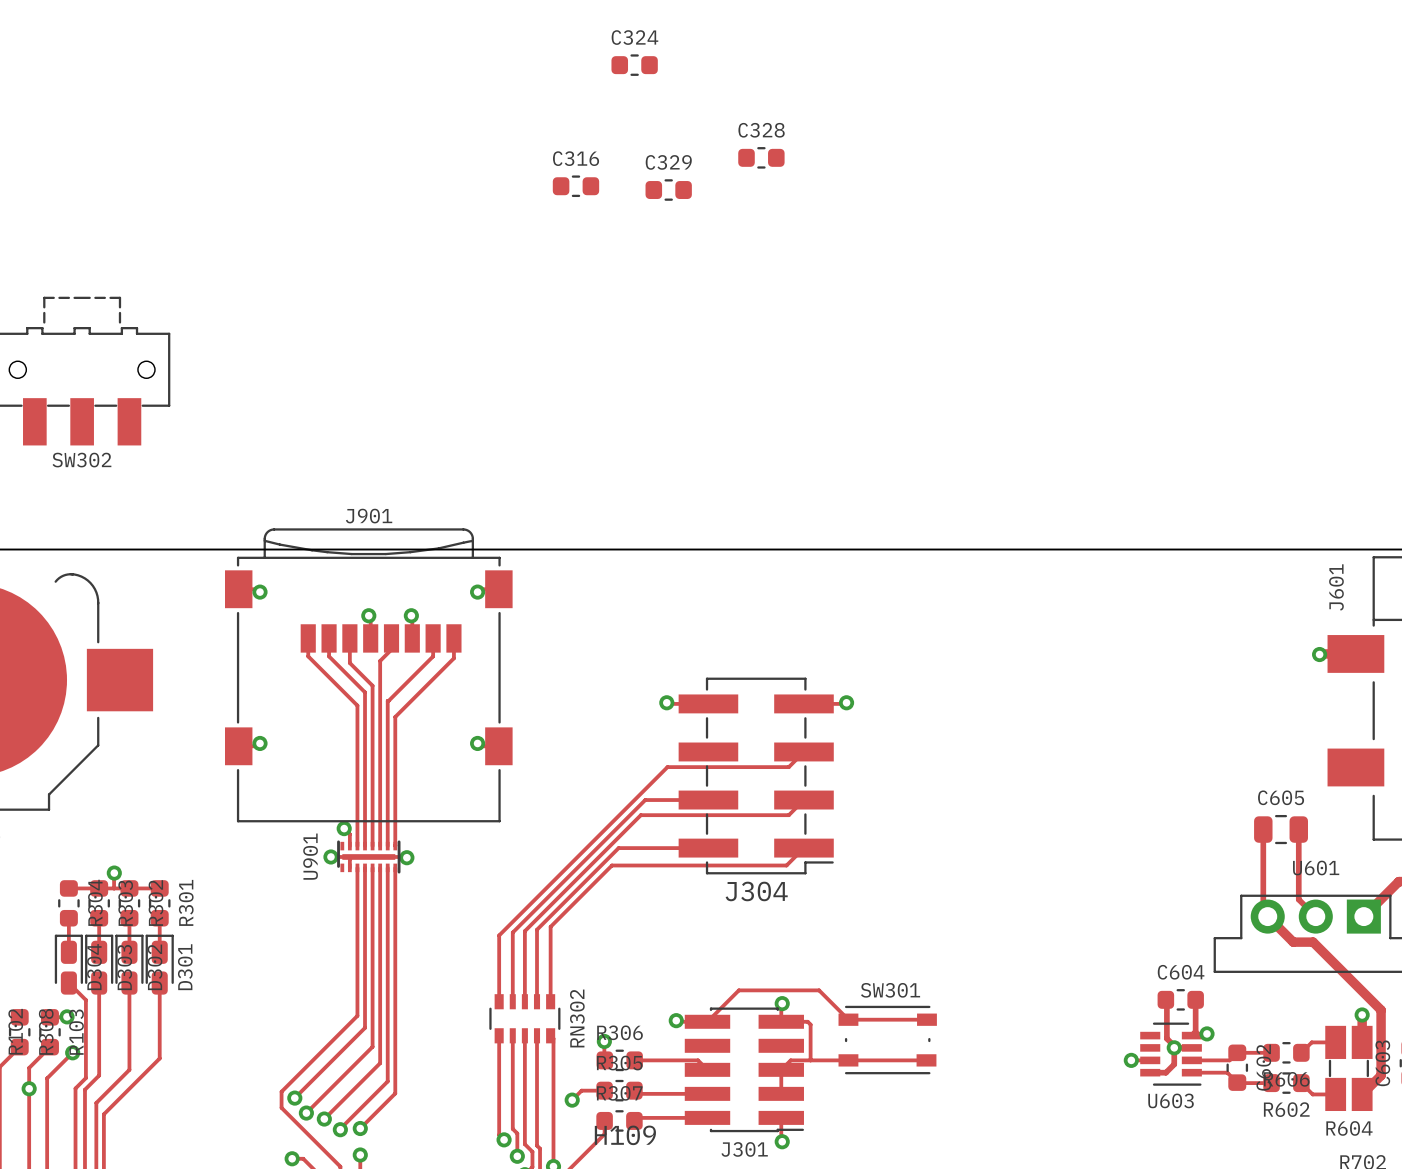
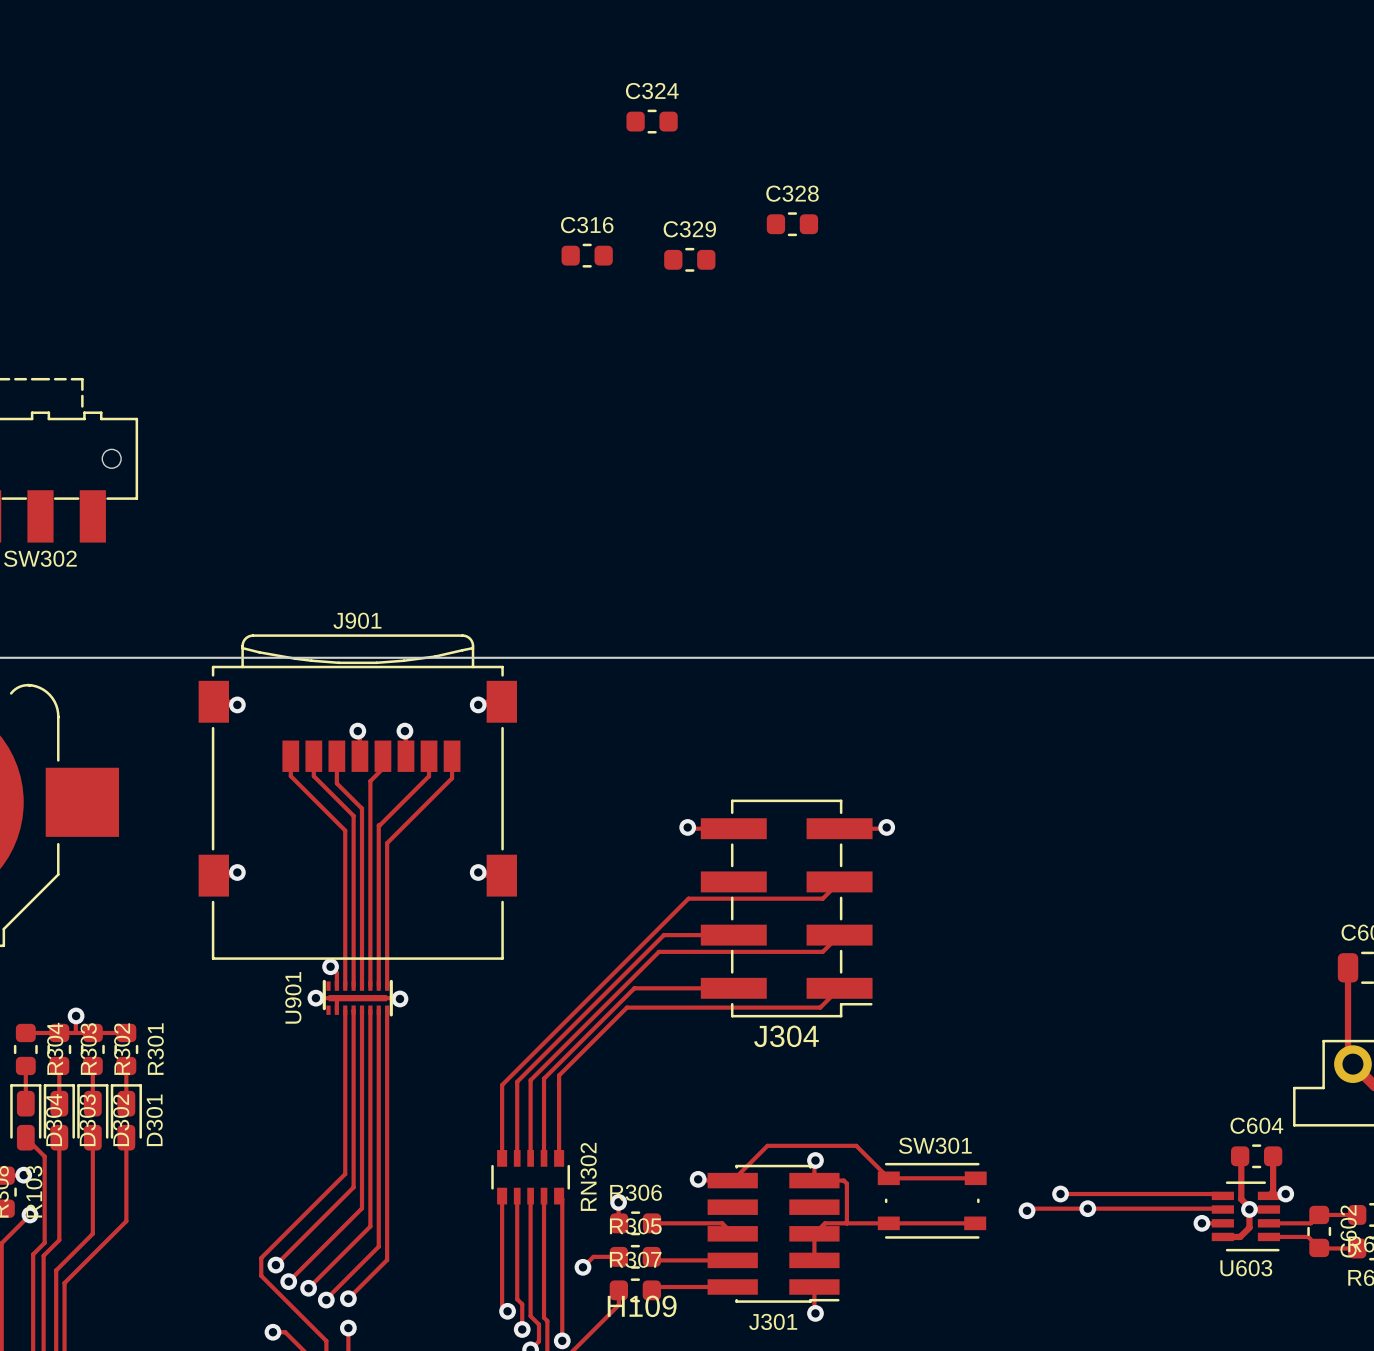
track: none -> (1060, 1194) (1220, 1194) (1222, 1195)
via: none -> (1060, 1194)
via: none -> (1087, 1208)
track: none -> (1222, 1209) (1029, 1208) (1027, 1210)
via: none -> (1027, 1210)

